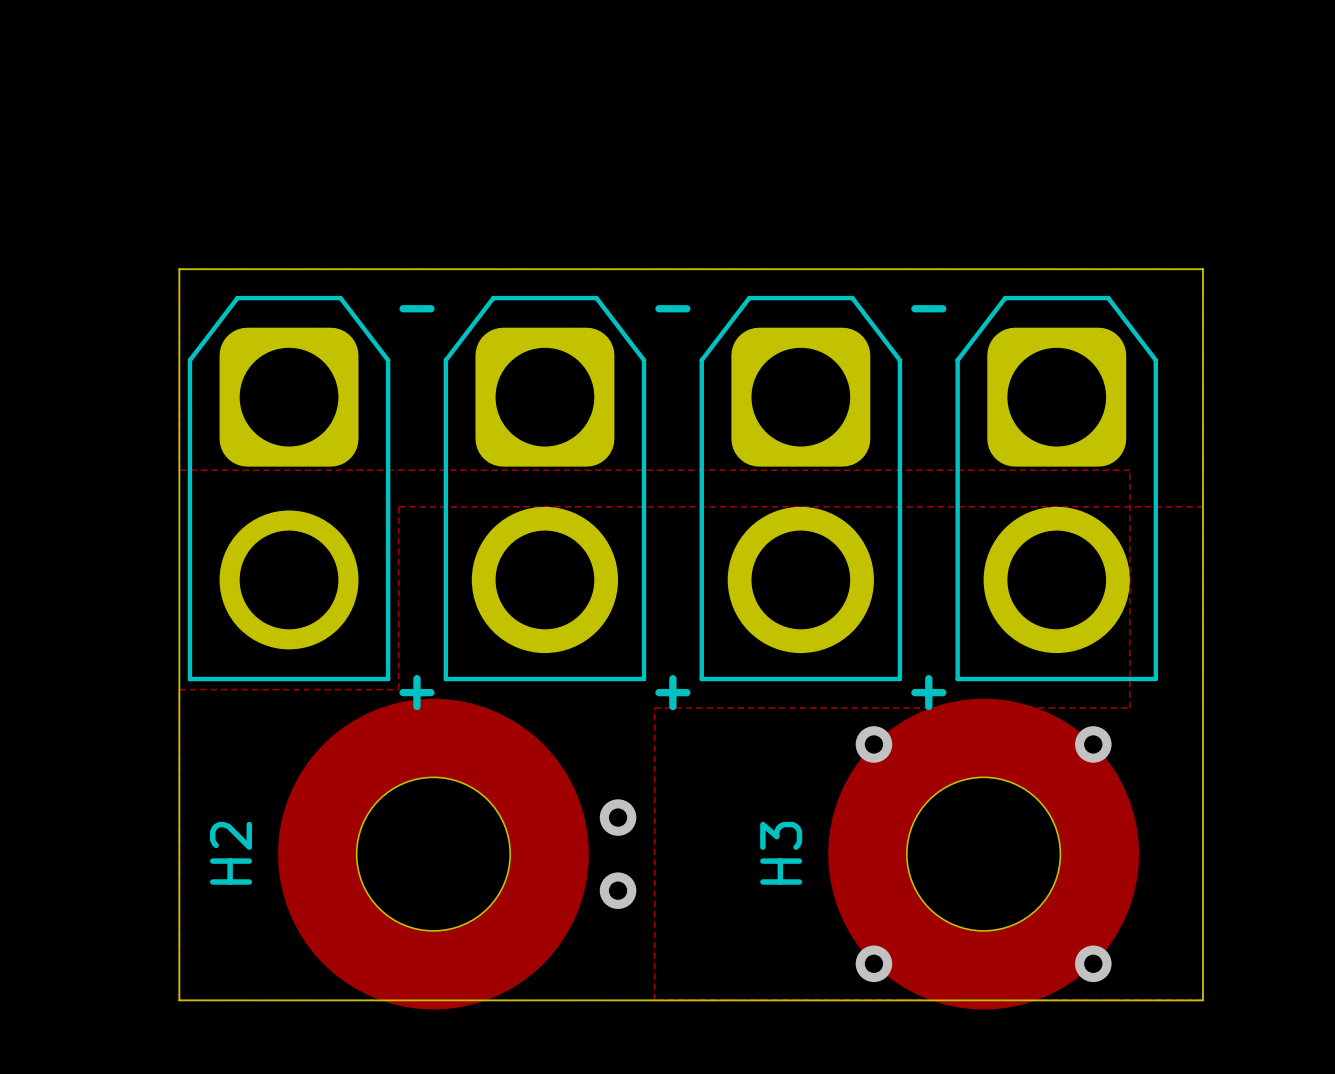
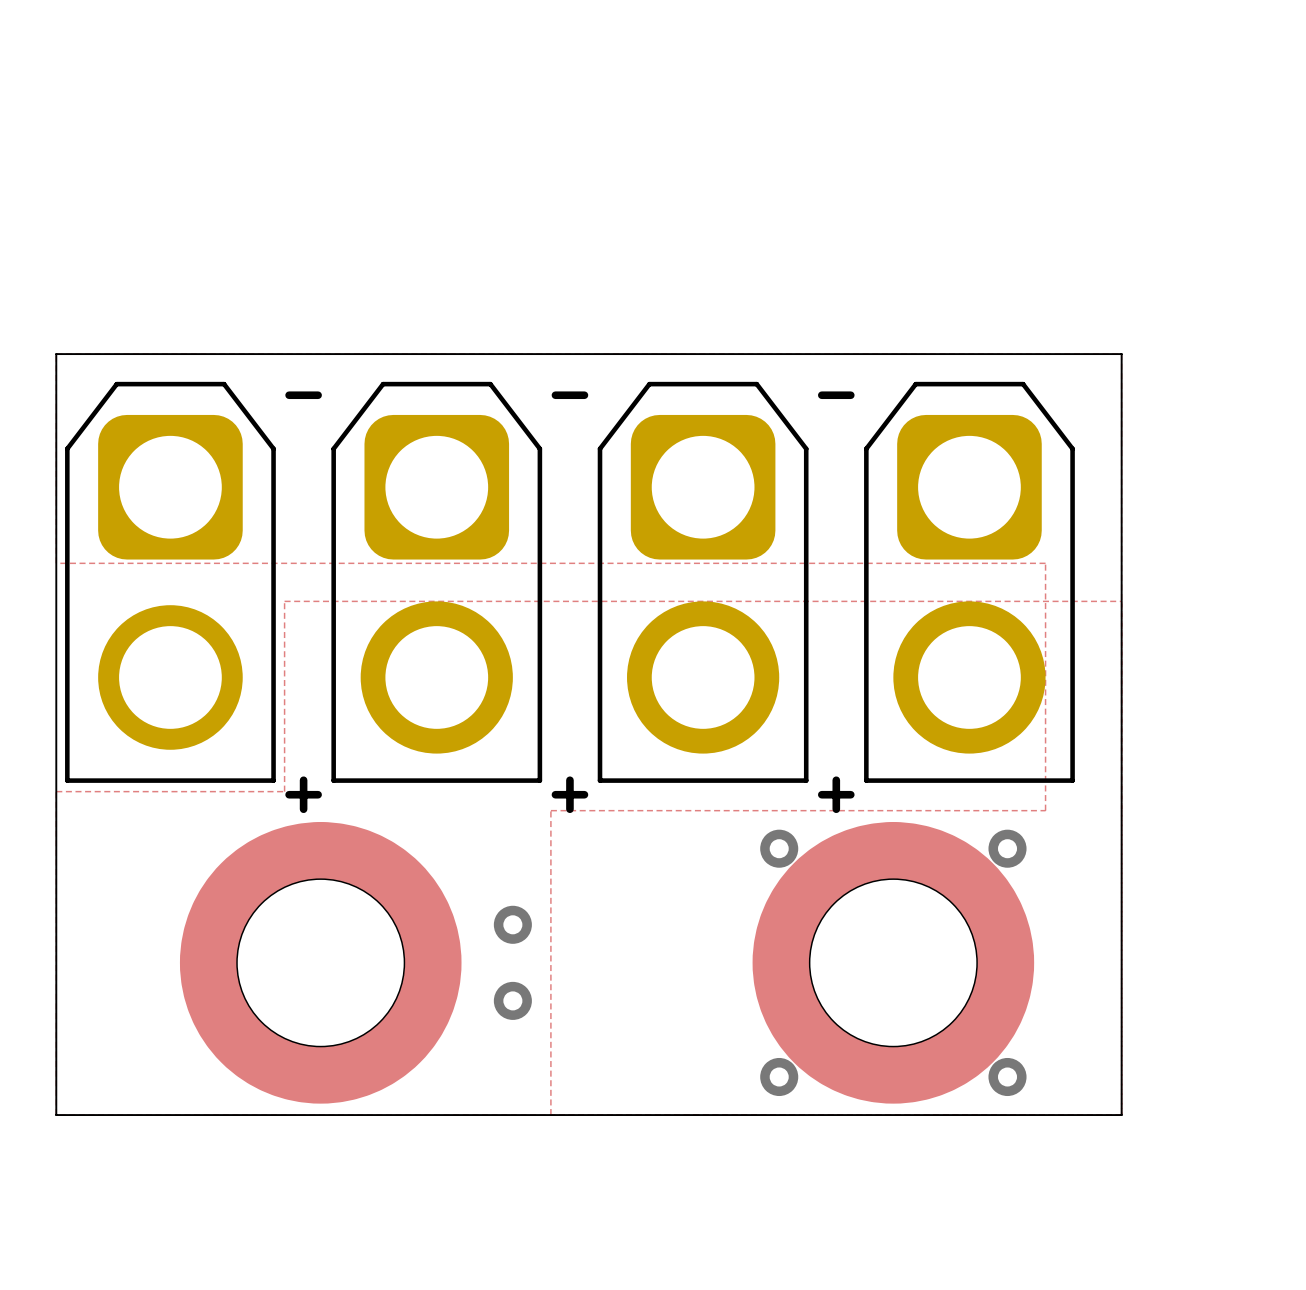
H2: (433, 854) -> none
part: none -> (320, 962)
H3: (983, 854) -> none
part: none -> (893, 962)

